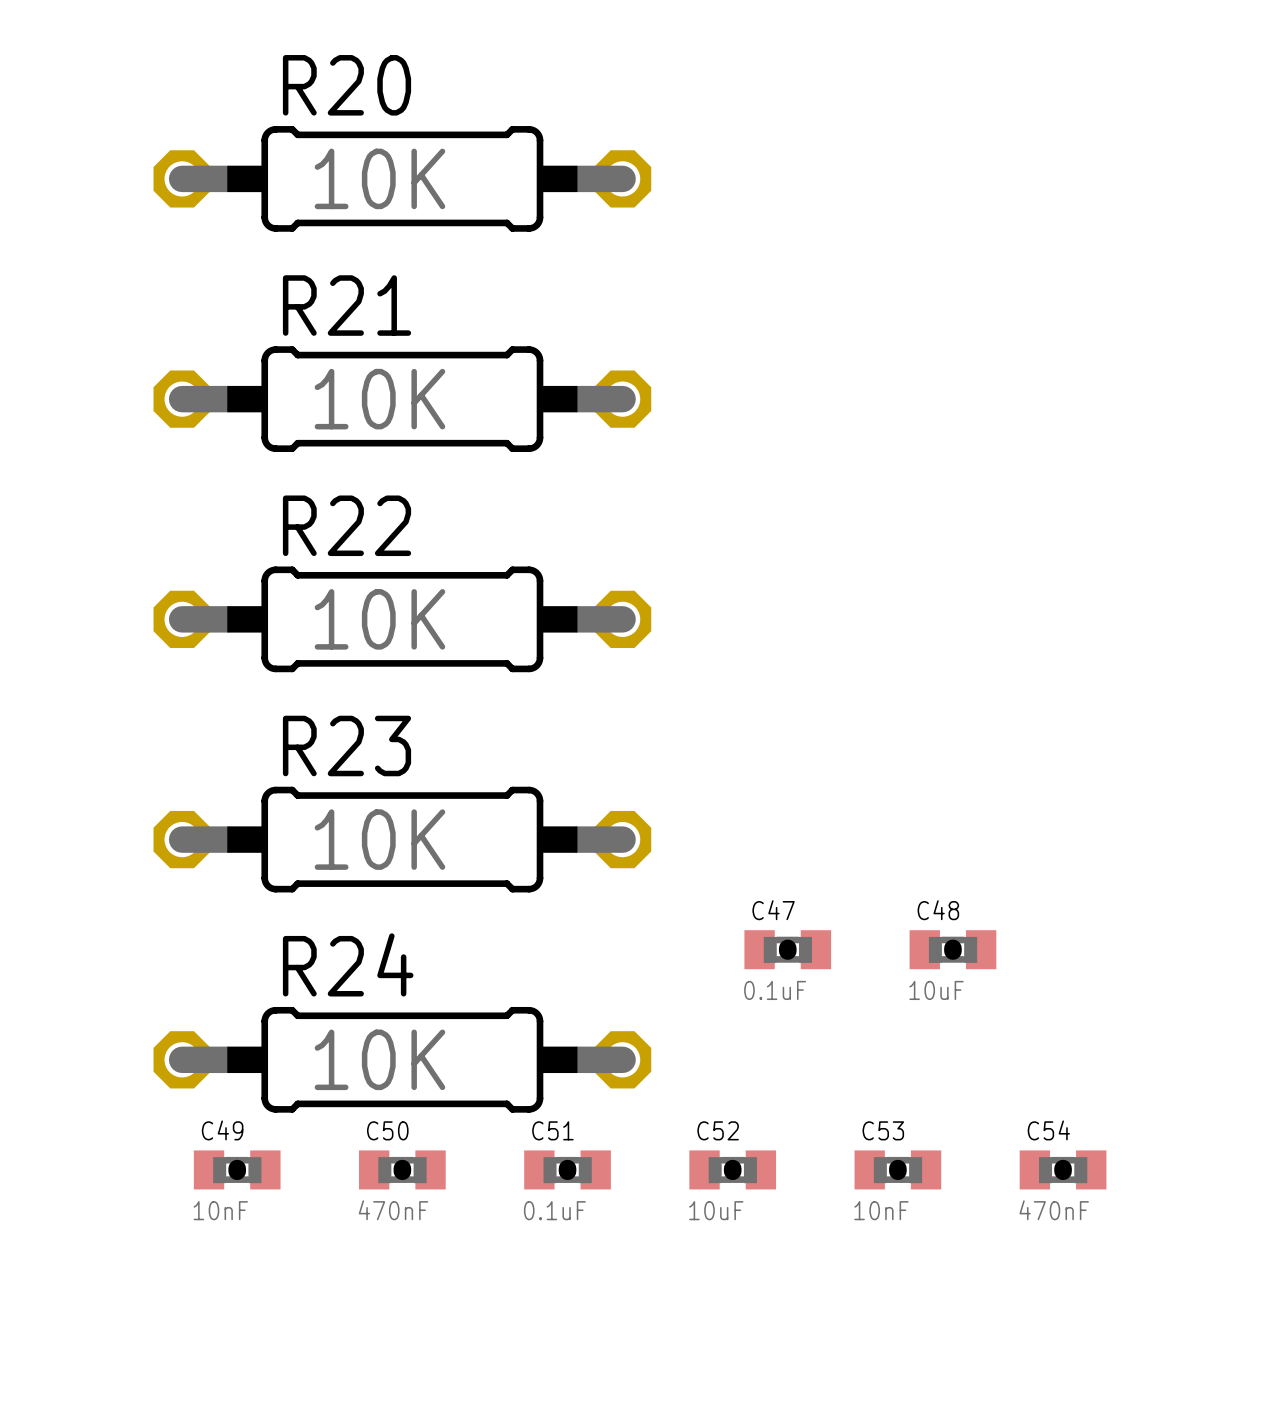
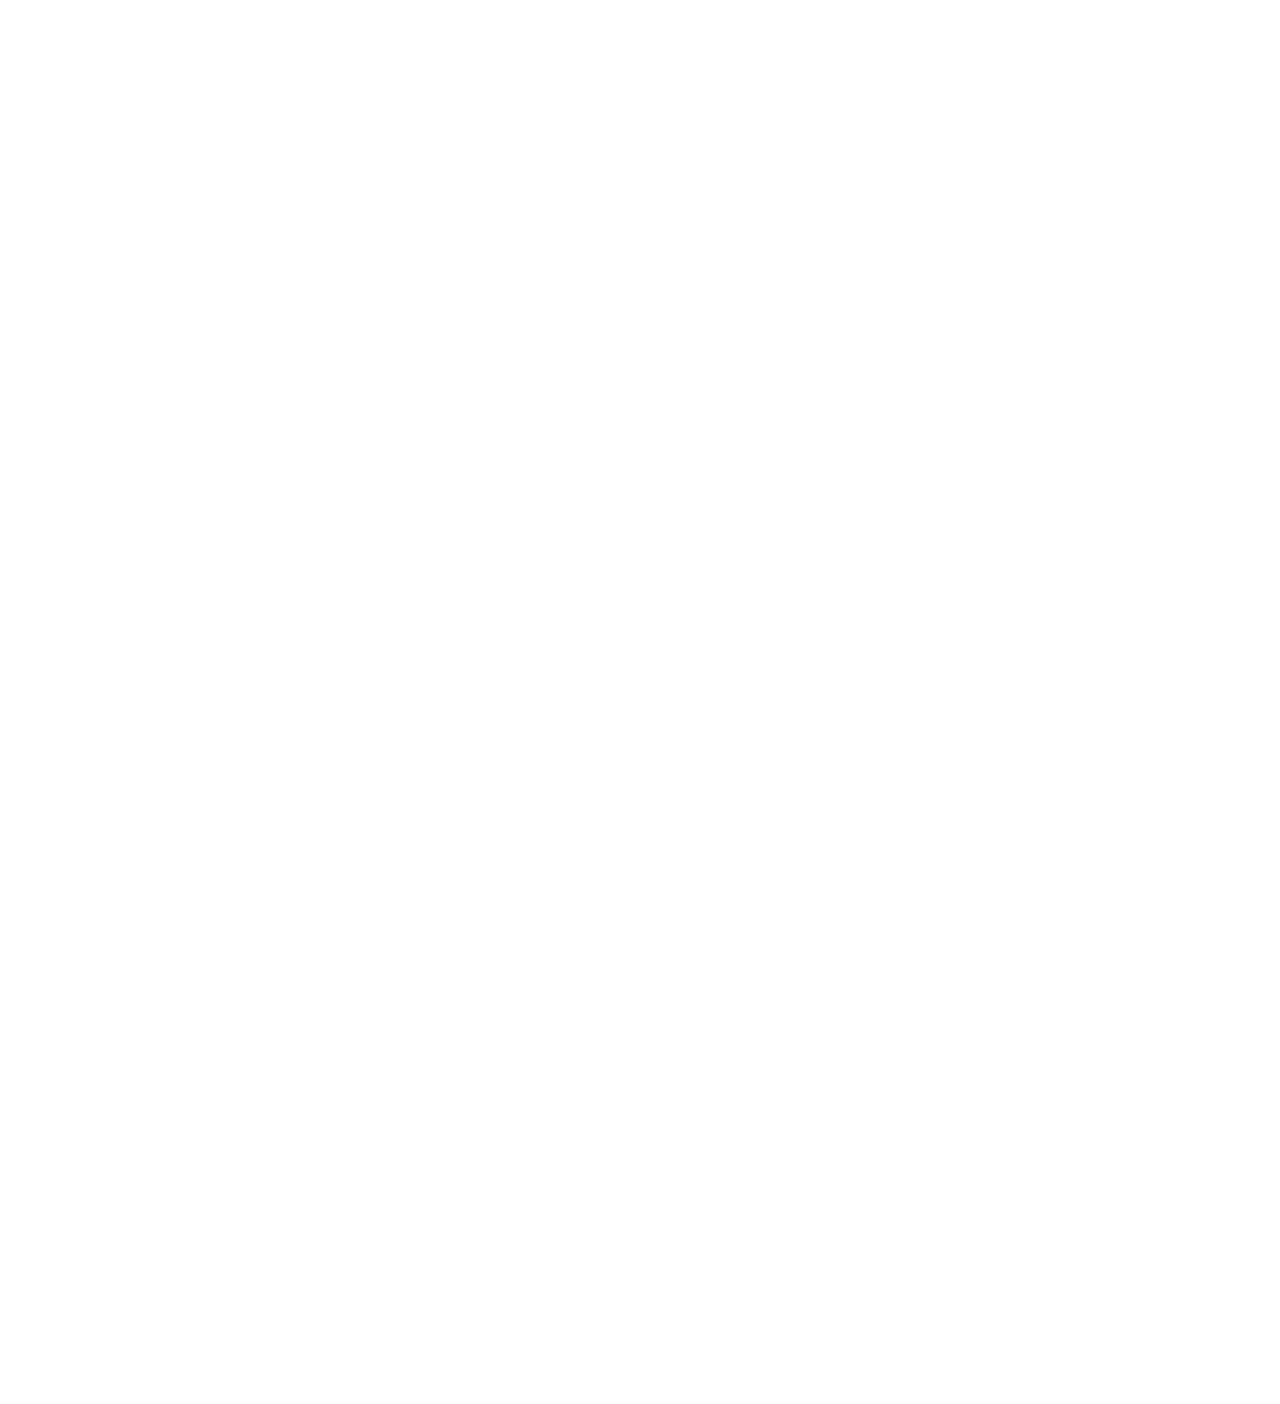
R20: 10K (402, 178) -> none
R21: 10K (402, 399) -> none
R22: 10K (402, 619) -> none
R23: 10K (402, 839) -> none
C47: 0.1uF (787, 949) -> none
C48: 10uF (952, 949) -> none
R24: 10K (402, 1059) -> none
C49: 10nF (237, 1169) -> none
C50: 470nF (402, 1169) -> none
C51: 0.1uF (567, 1169) -> none
C52: 10uF (732, 1169) -> none
C53: 10nF (897, 1169) -> none
C54: 470nF (1063, 1169) -> none

